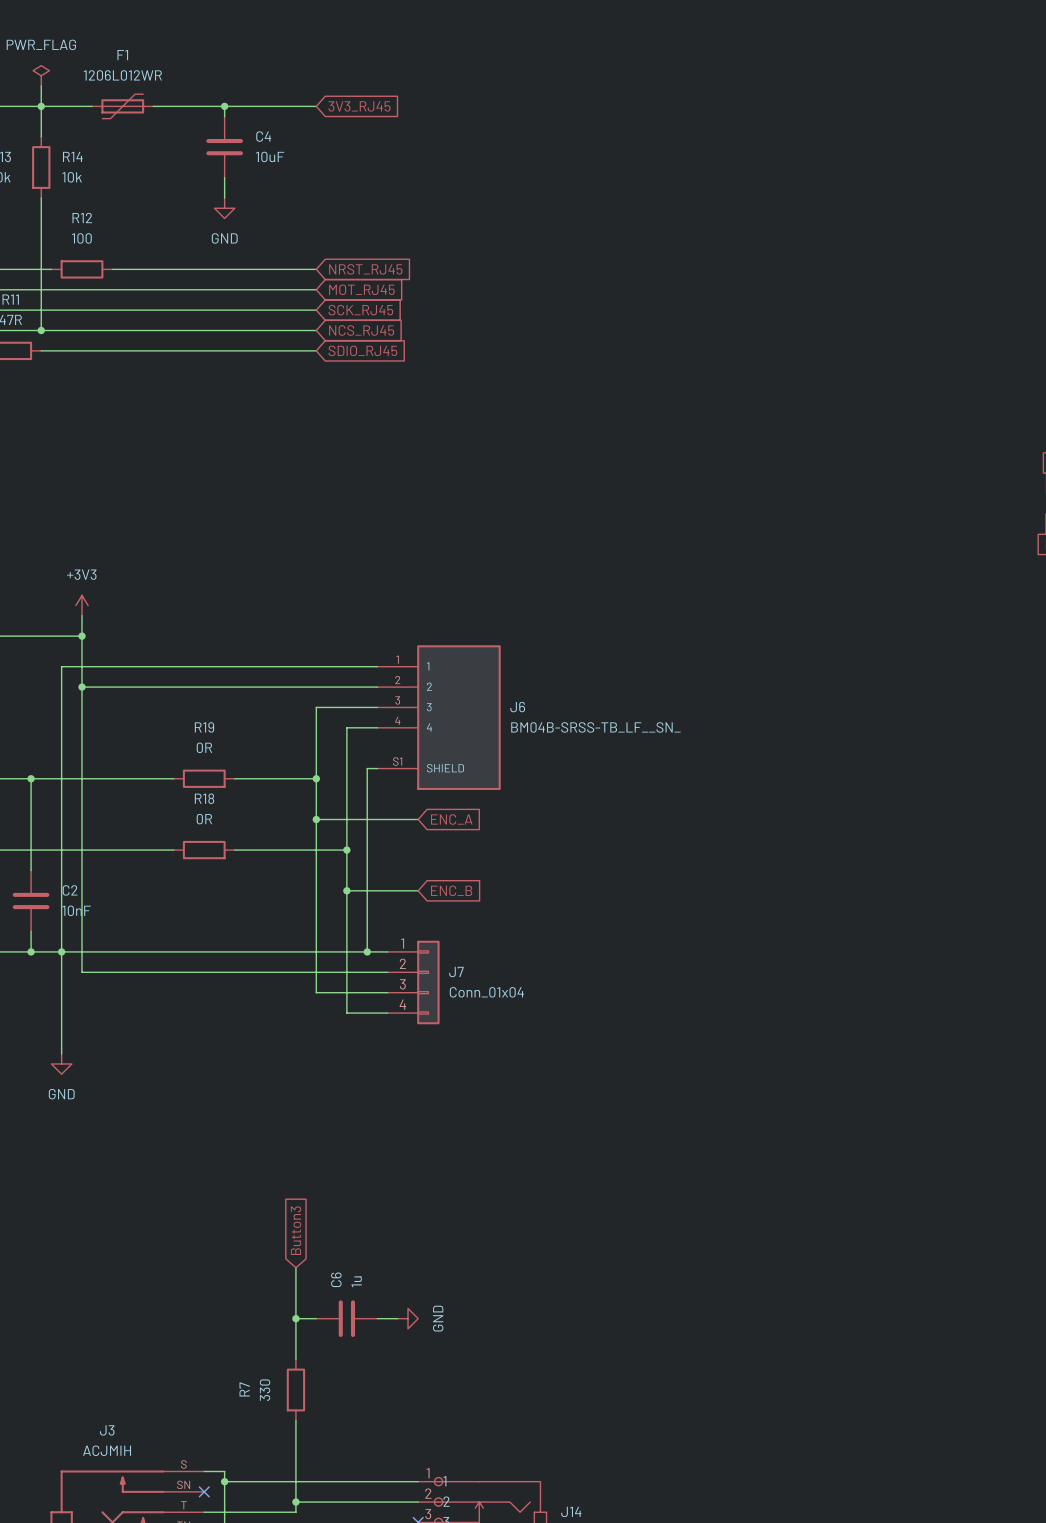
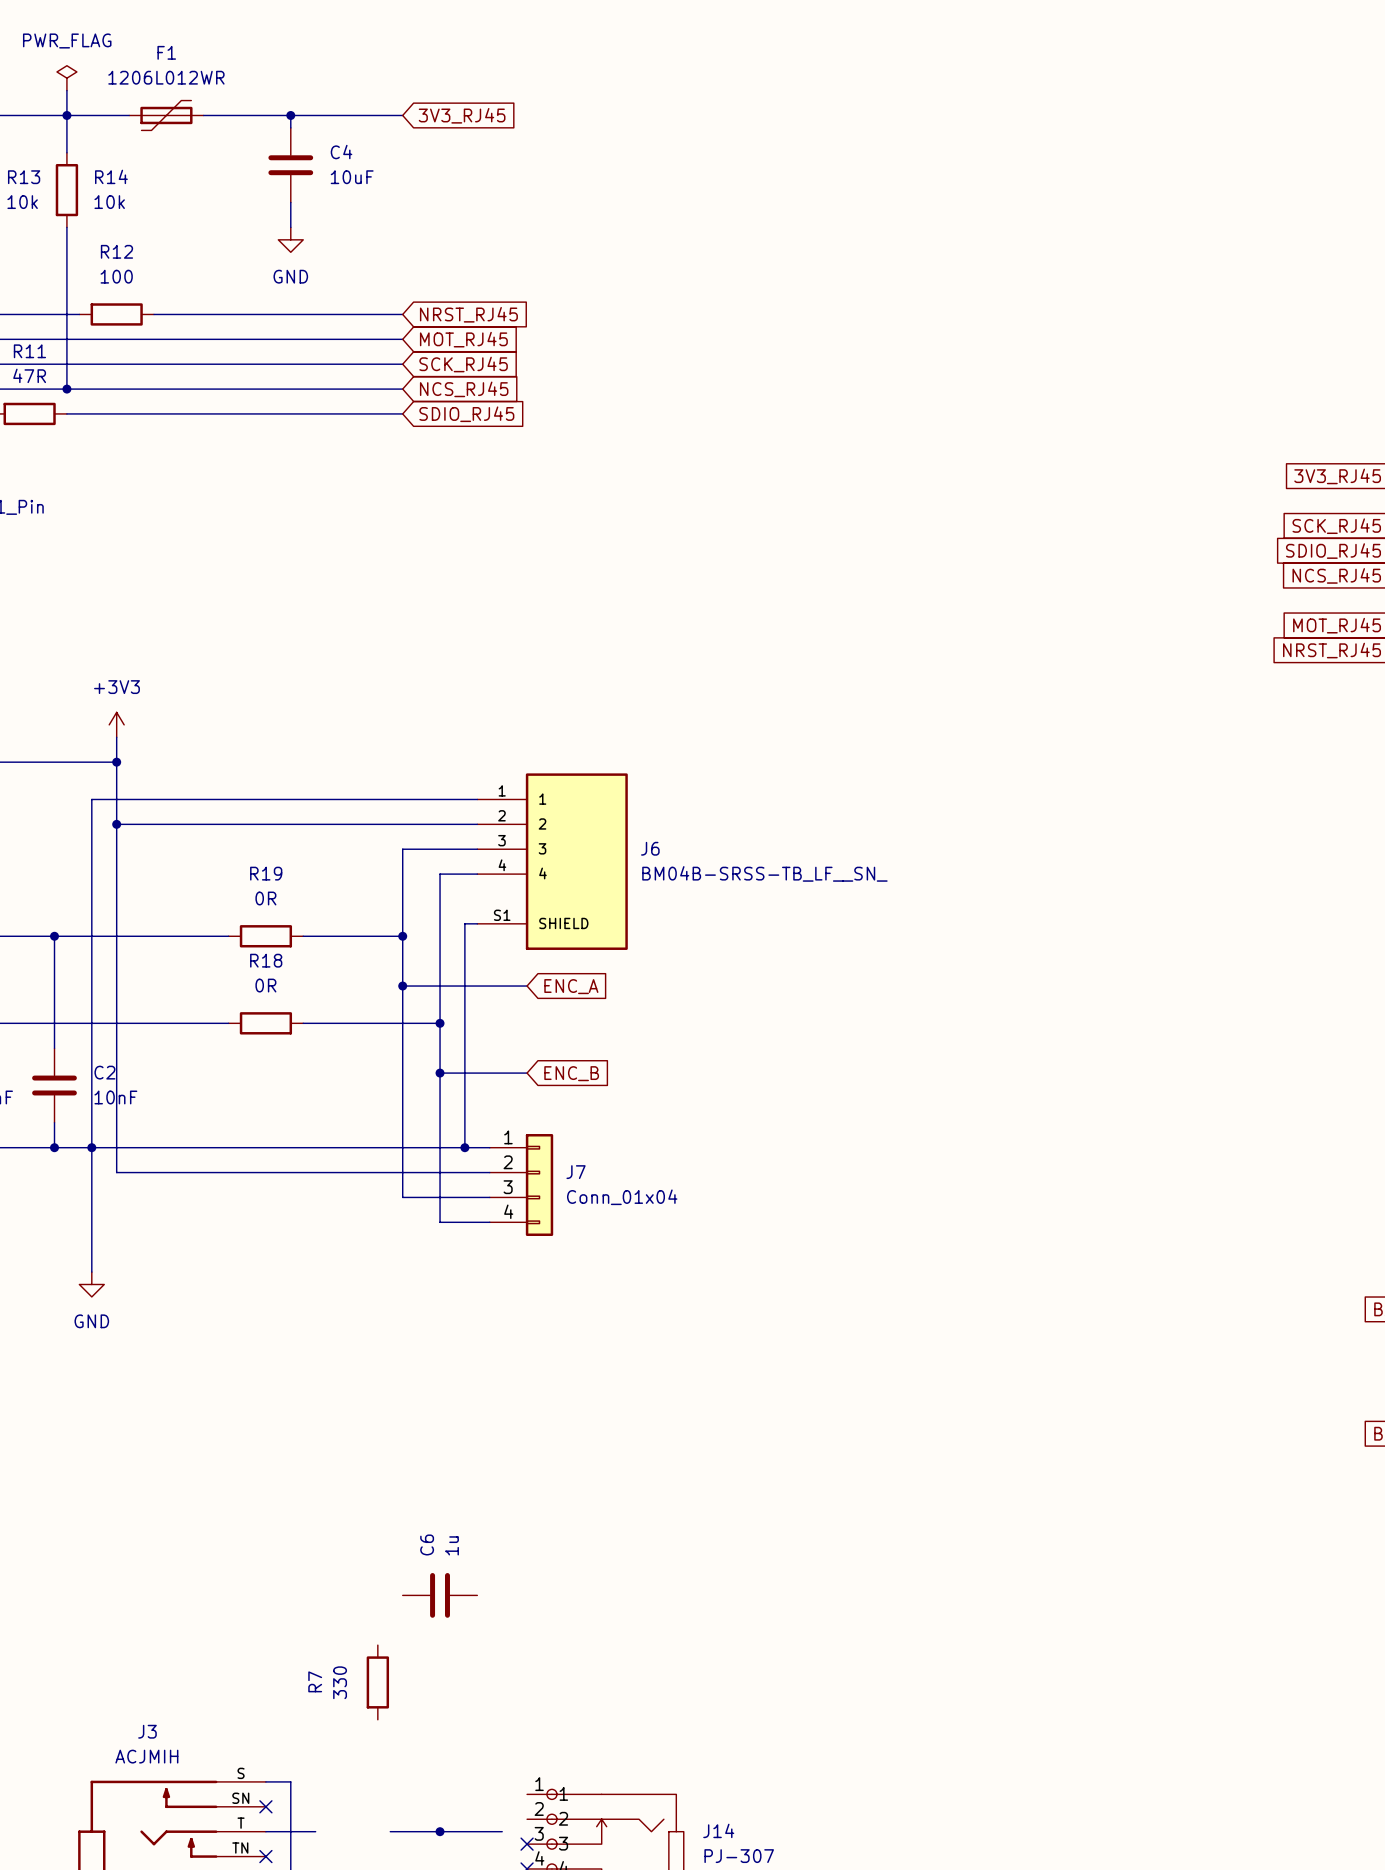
global label: Button3 (296, 1230) -> none
wire: (295, 1267) (295, 1359) -> none
wire: (295, 1318) (316, 1318) -> none
junction: (295, 1318) -> none
wire: (377, 1318) (397, 1318) -> none
power symbol: GND (408, 1318) -> none
wire: (295, 1420) (295, 1512) (245, 1512) -> none
wire: (224, 1481) (418, 1481) -> none
junction: (224, 1481) -> none
wire: (295, 1502) (418, 1502) -> none
junction: (295, 1502) -> none
wire: none -> (390, 1831) (502, 1831)
junction: none -> (440, 1831)

